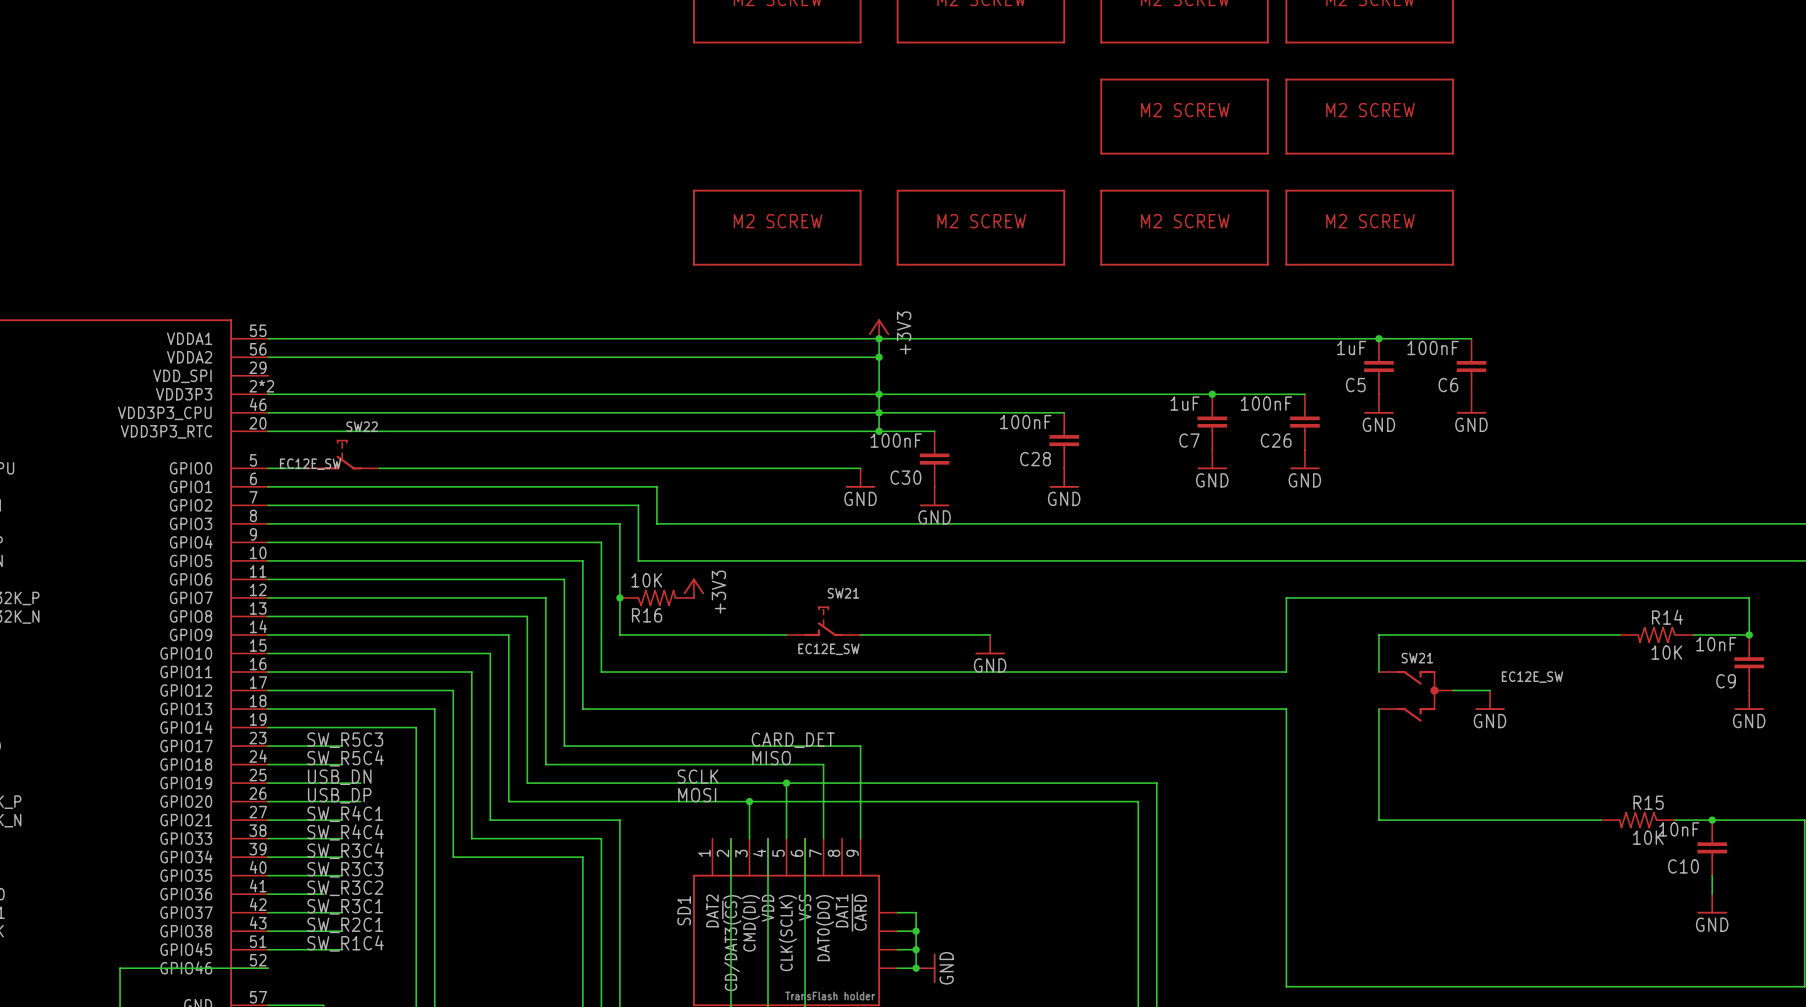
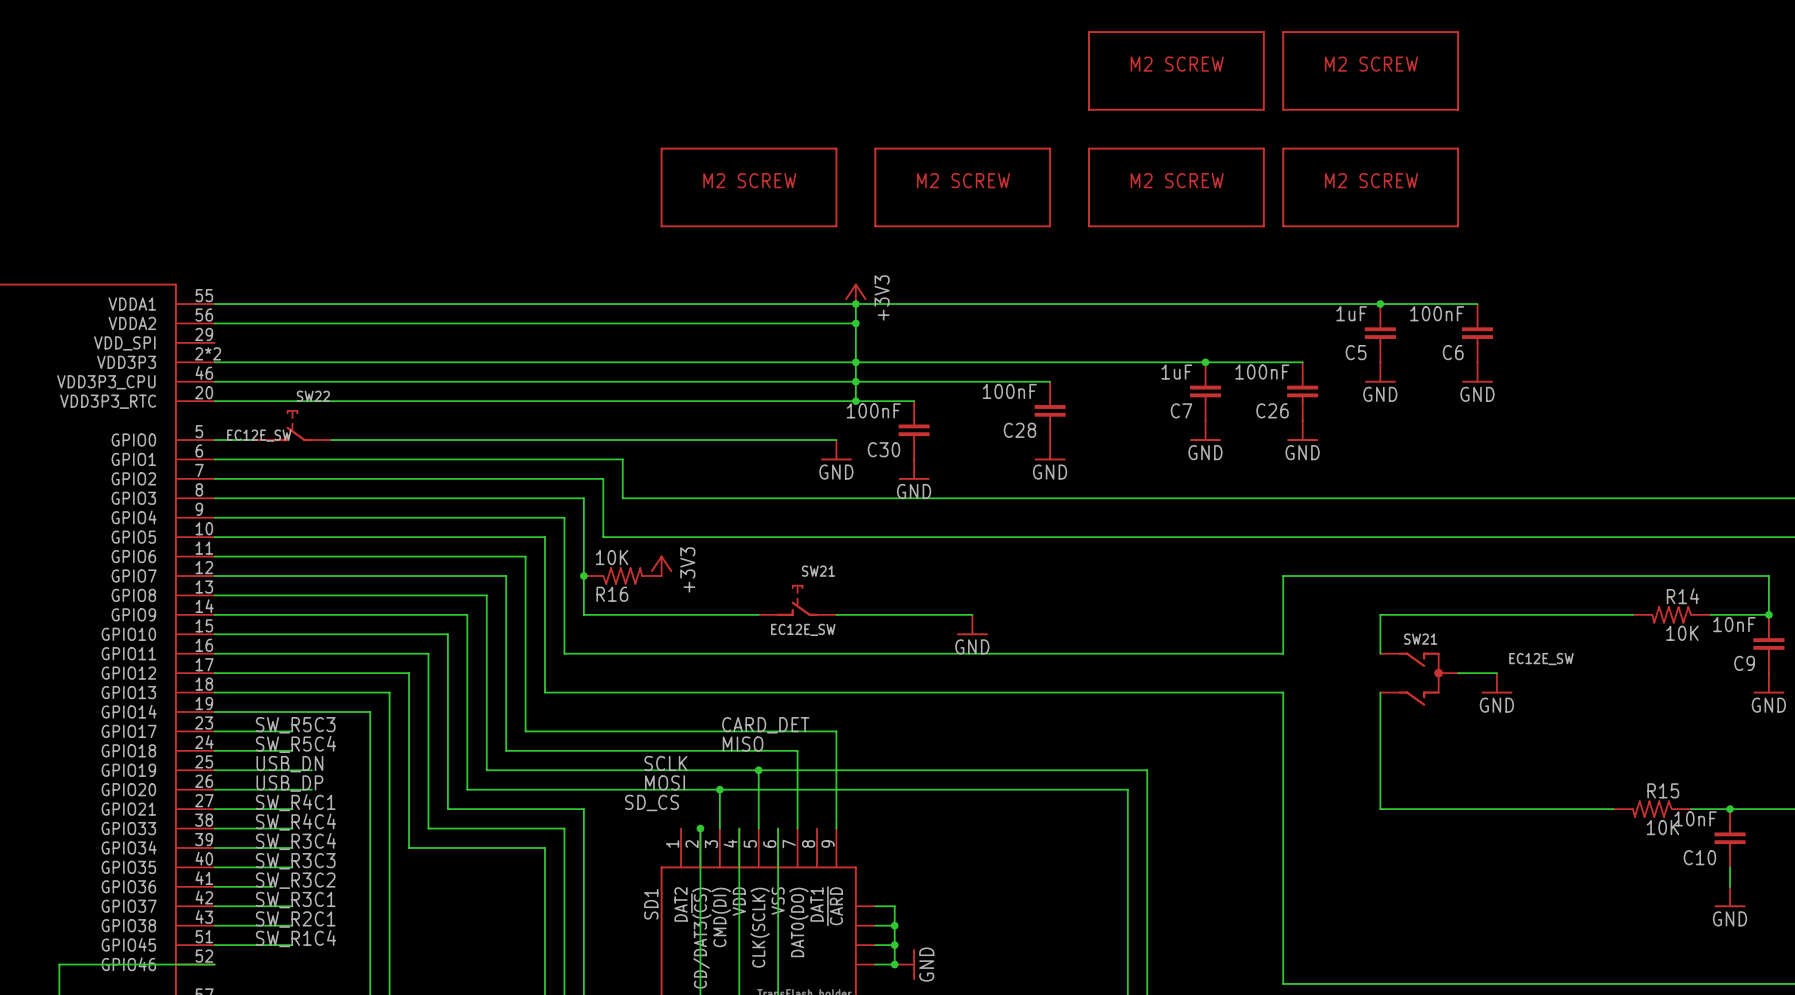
label: none -> SD_CS (652, 802)
junction: none -> (700, 828)

